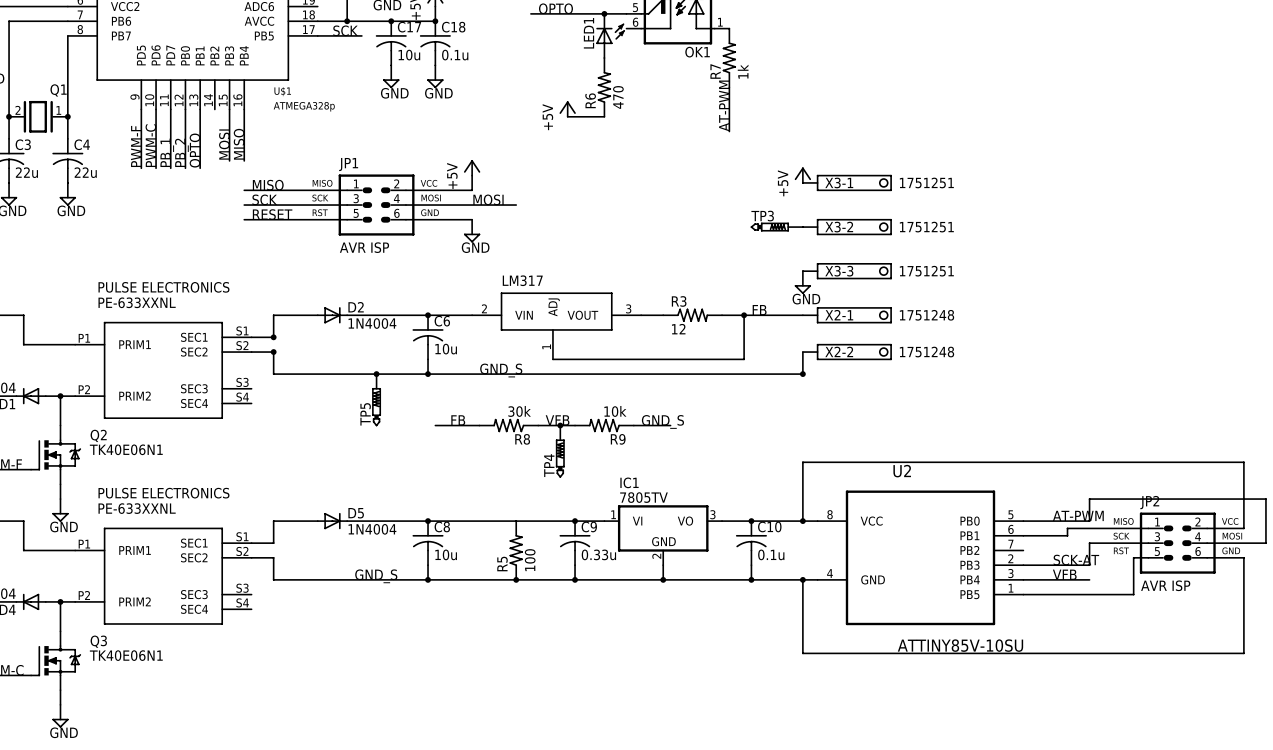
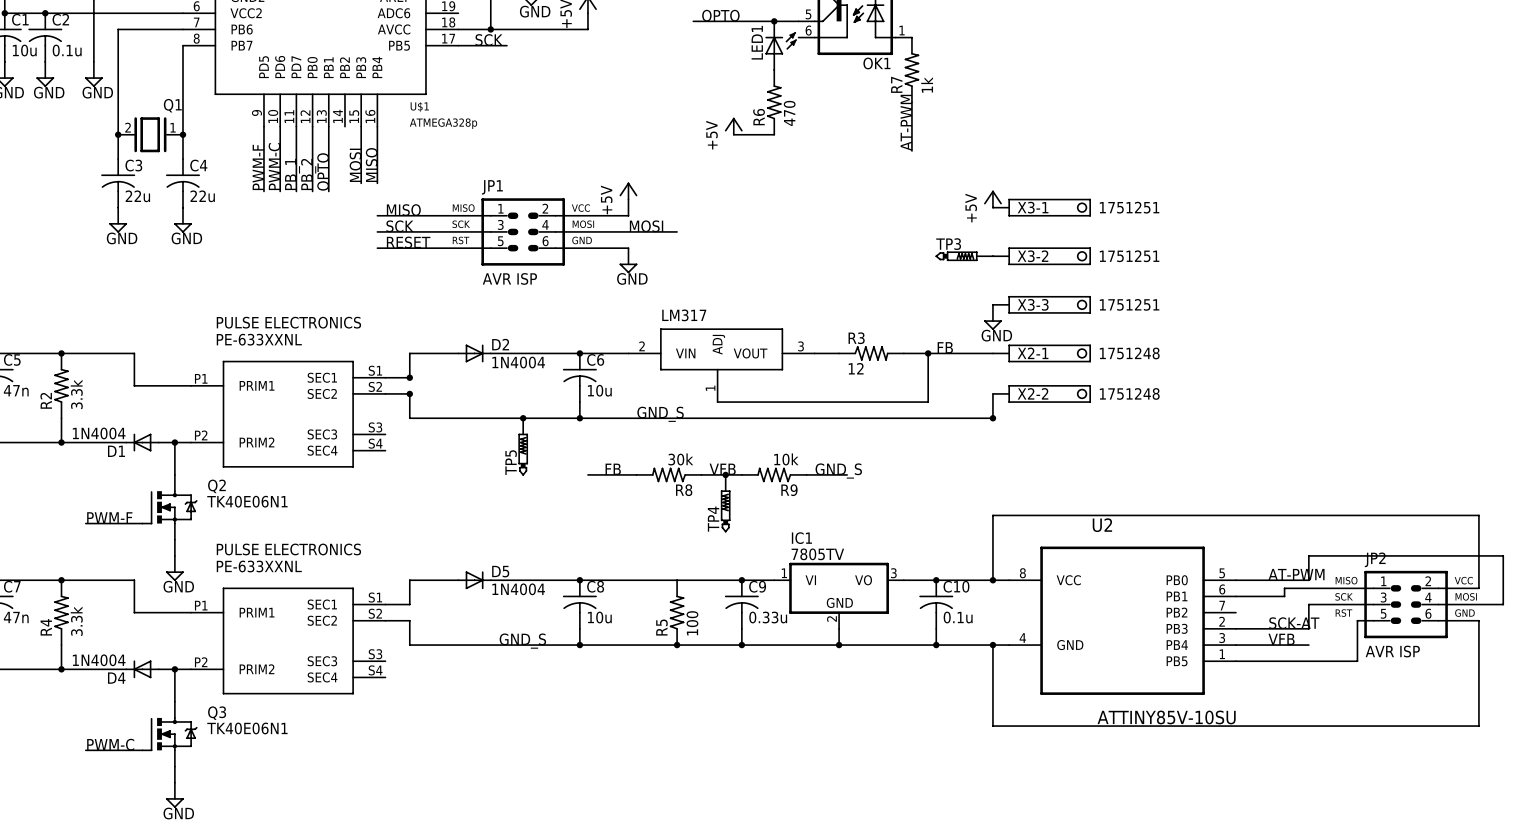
junction: (391, 21) -> none
junction: (435, 21) -> none
C17: 10u (391, 43) -> none
C18: 0.1u (435, 43) -> none
power symbol: GND (391, 76) -> none
power symbol: GND (435, 76) -> none

